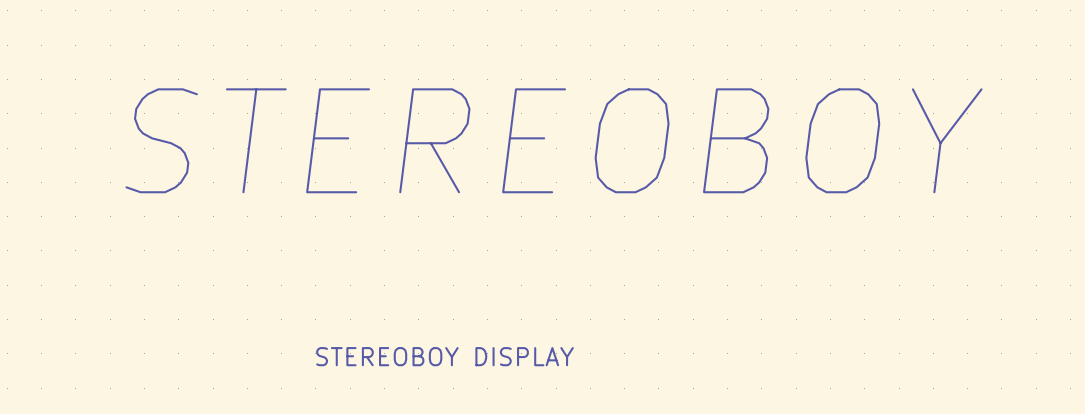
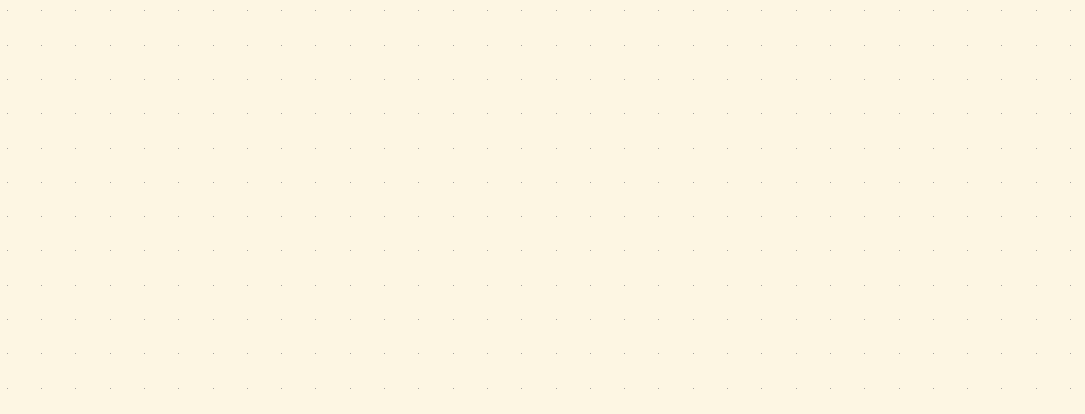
text: STEREOBOY (553, 140) -> none
text: STEREOBOY DISPLAY (444, 356) -> none

